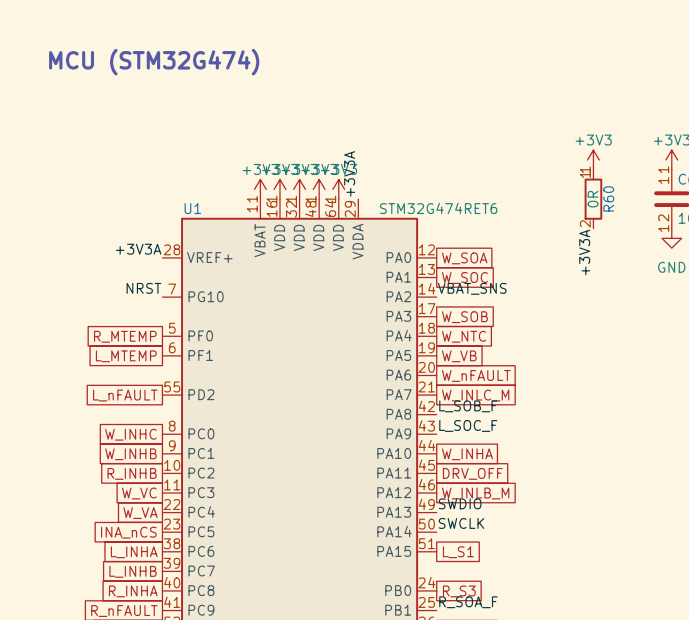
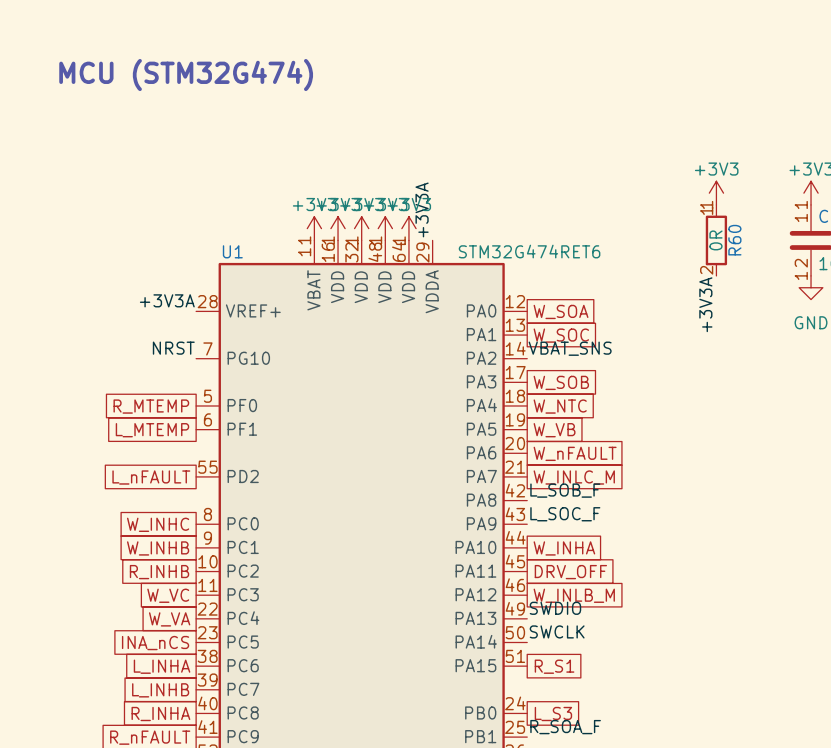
global label: L_S1 (458, 552) -> R_S1 (554, 666)
global label: R_S3 (459, 591) -> L_S3 (553, 714)

